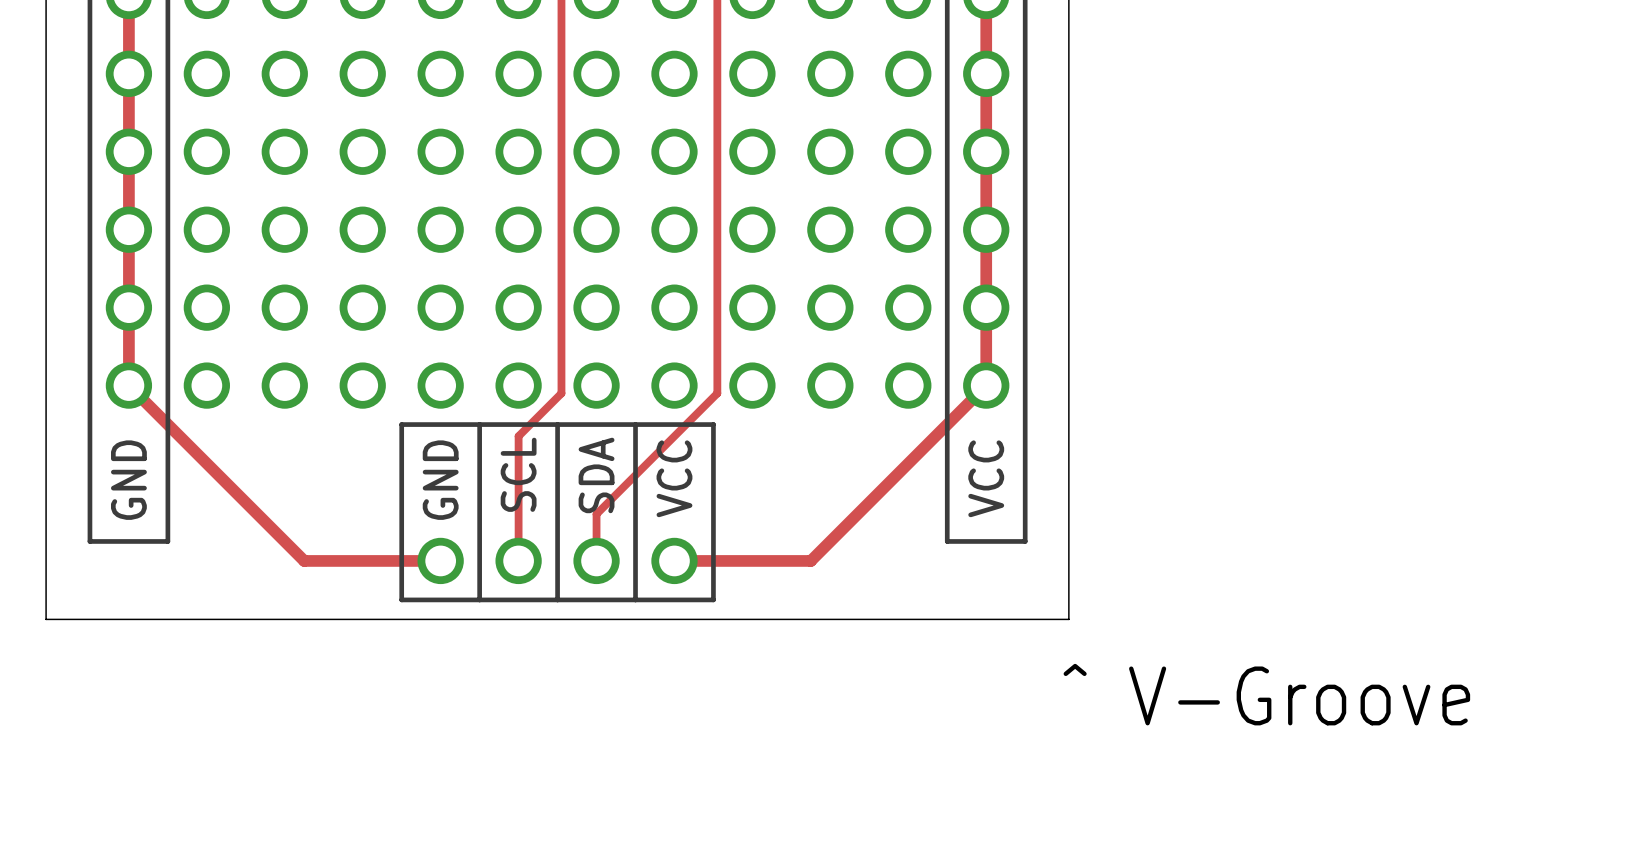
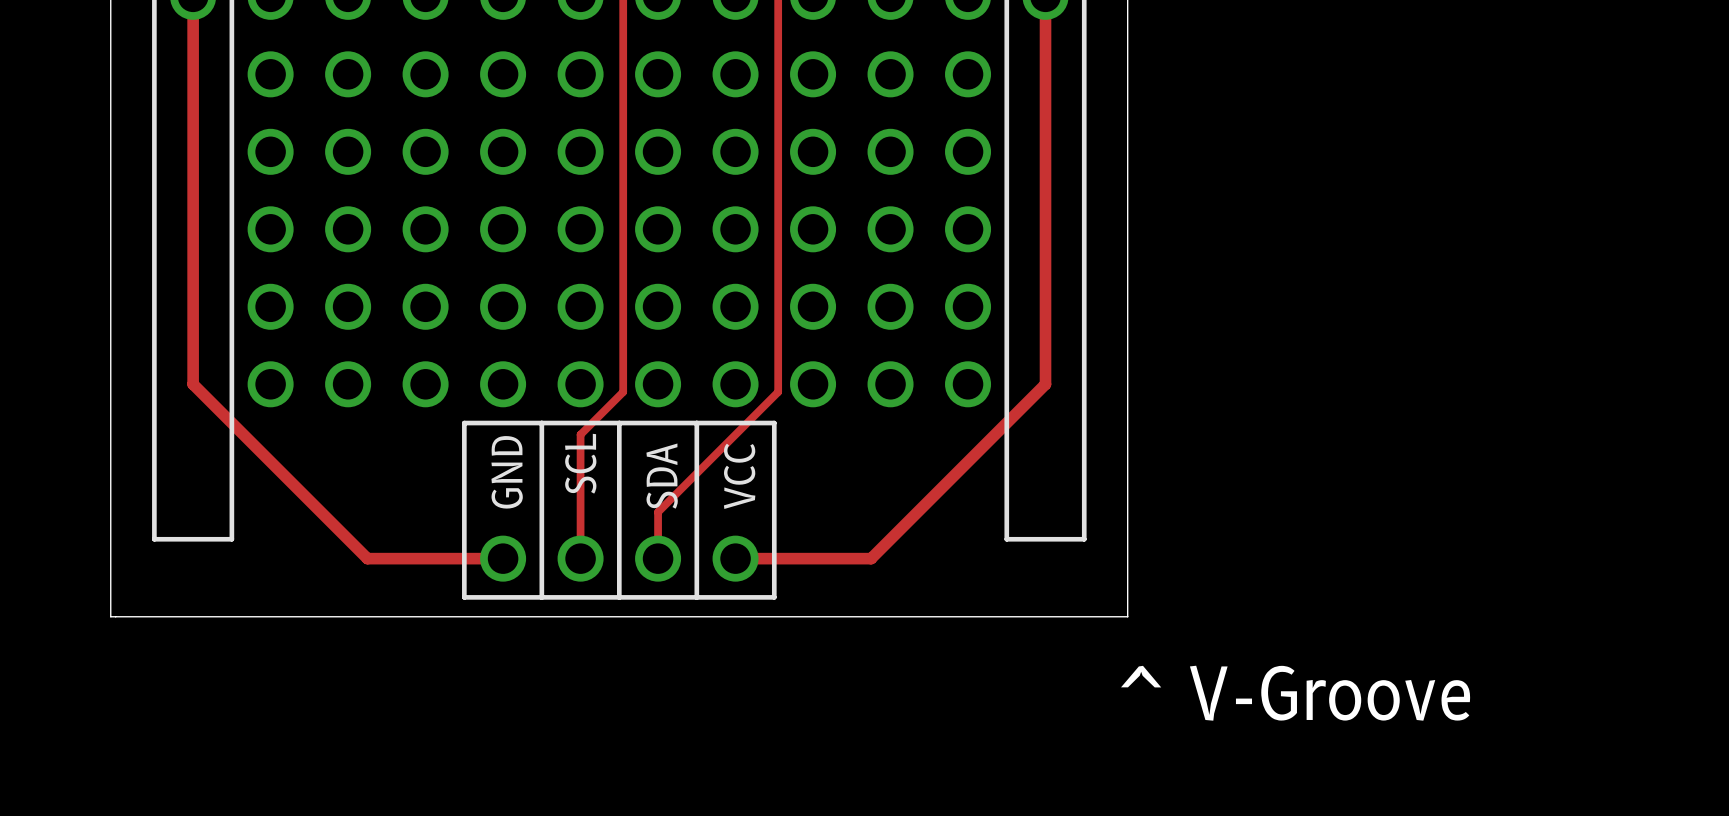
part: (128, 73) -> none
part: (986, 73) -> none
part: (128, 151) -> none
part: (986, 151) -> none
part: (128, 229) -> none
part: (986, 229) -> none
part: (128, 307) -> none
part: (986, 307) -> none
part: (128, 385) -> none
part: (986, 385) -> none
text position: SDA (596, 475) -> SDA (662, 476)
text position: VCC (674, 478) -> VCC (739, 476)
text: VCC (986, 478) -> none
text: GND (128, 480) -> none
text position: GND (440, 480) -> GND (507, 472)

